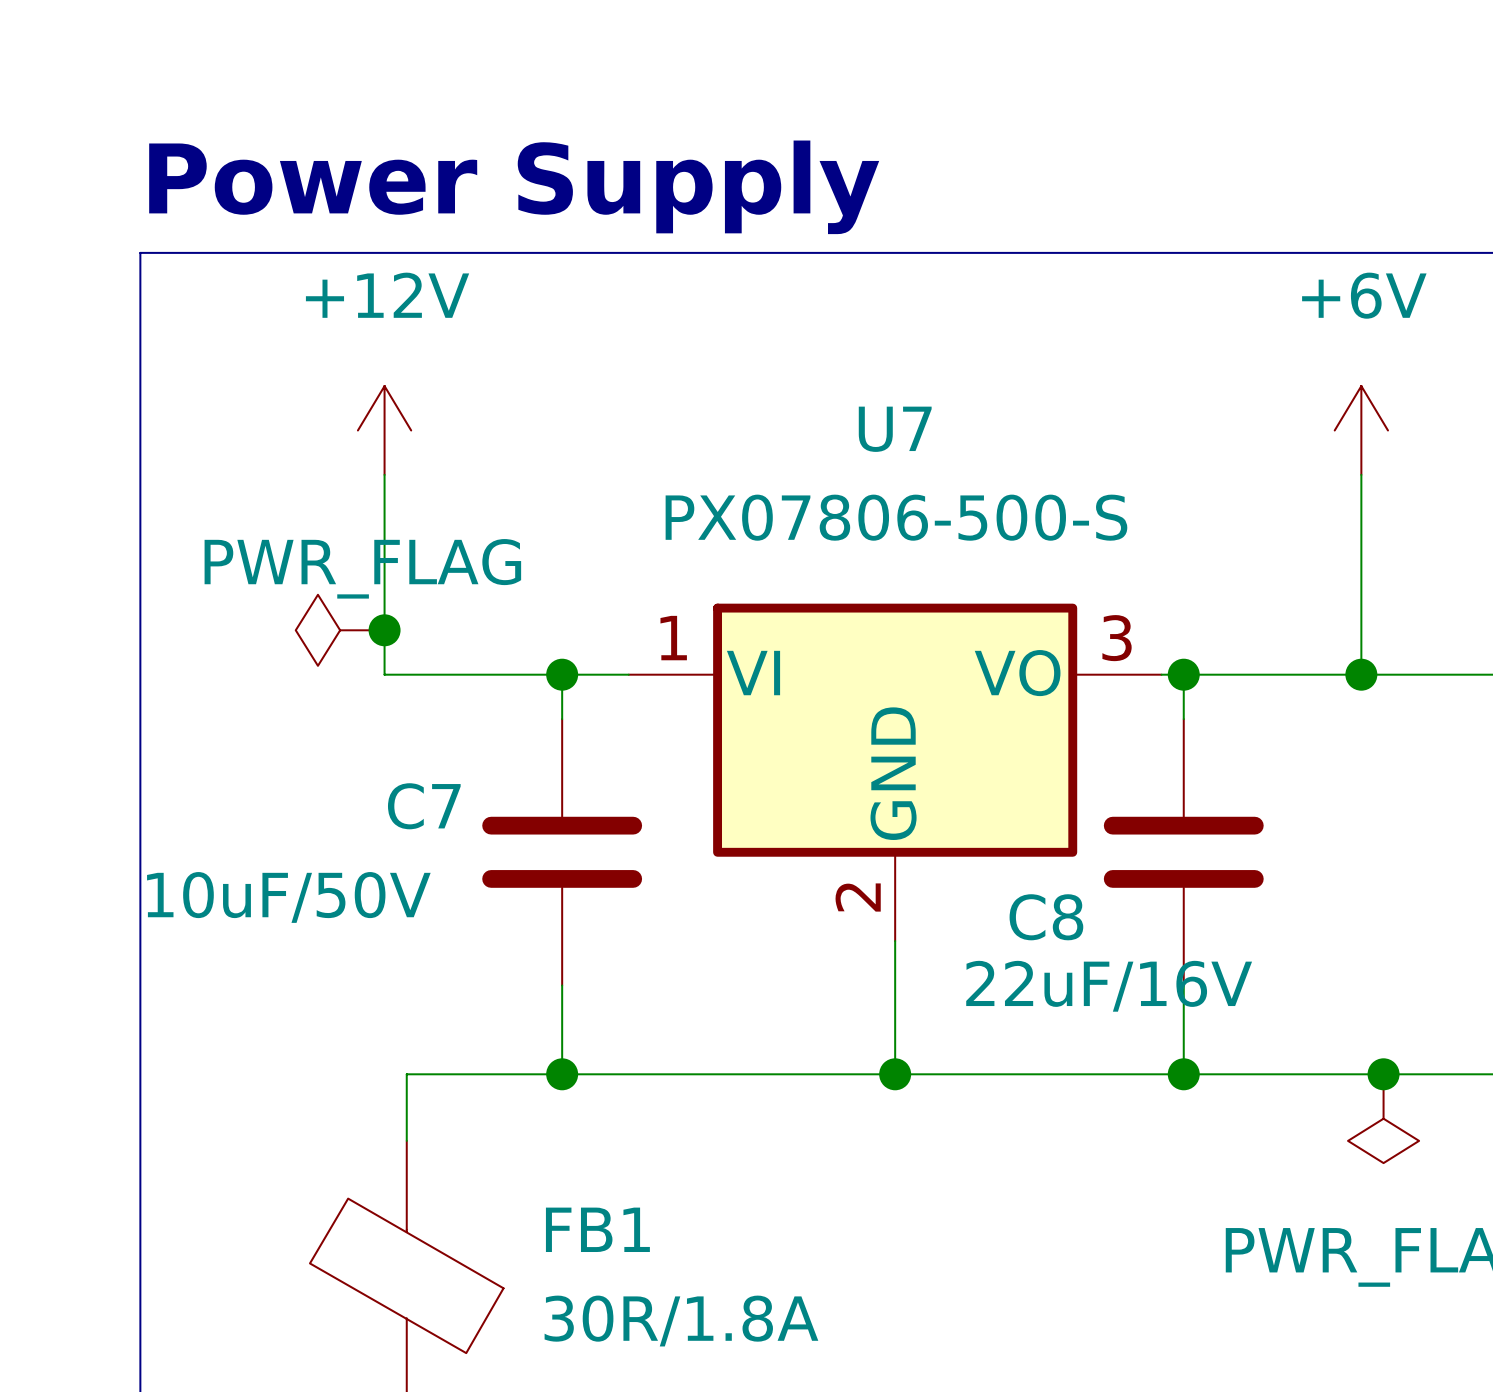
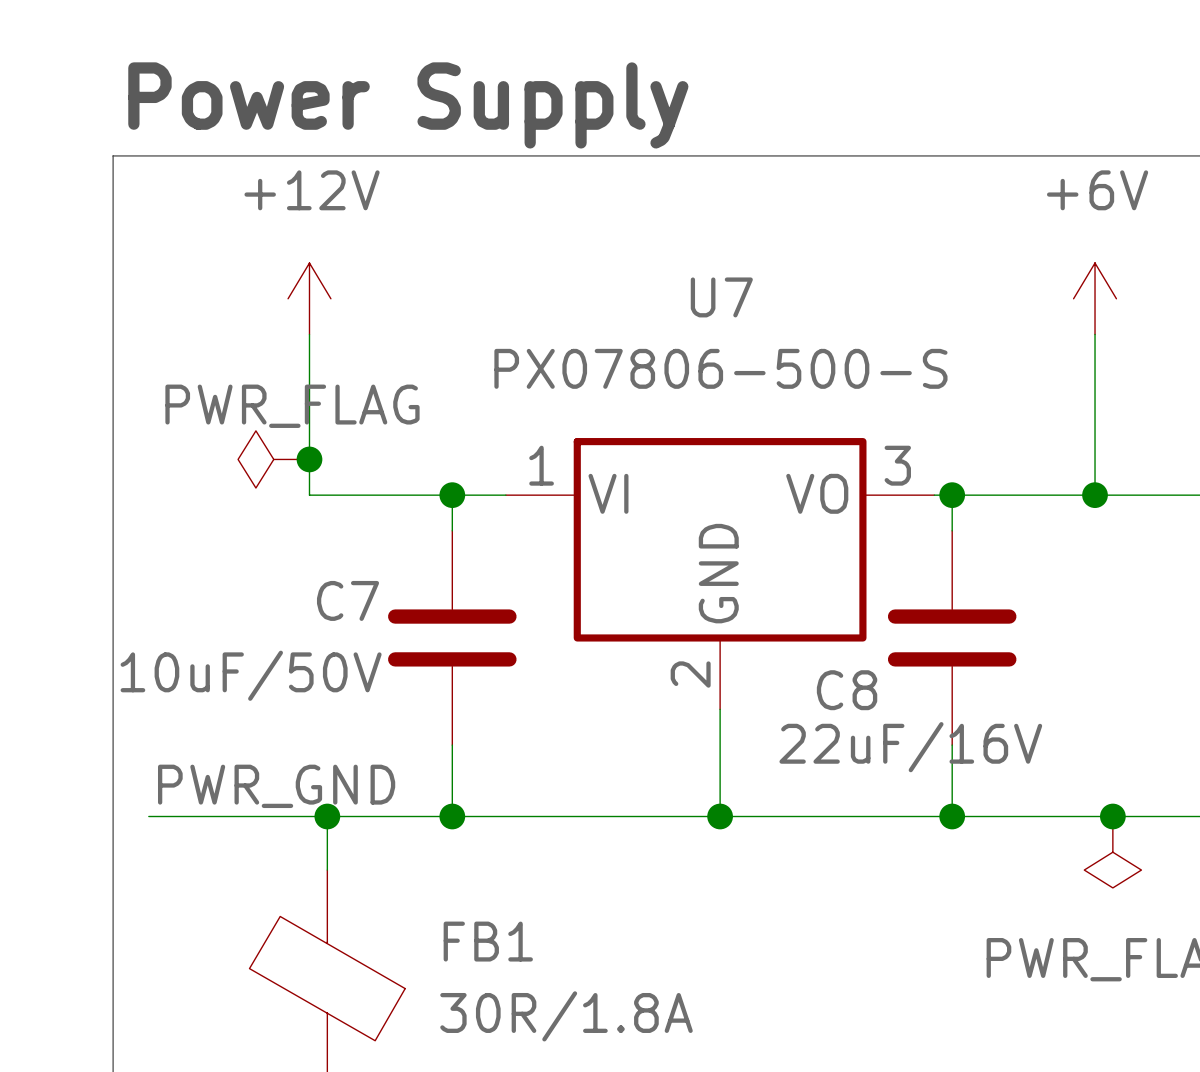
label: none -> PWR_GND (276, 786)
wire: none -> (148, 816) (327, 816)
junction: none -> (327, 816)

